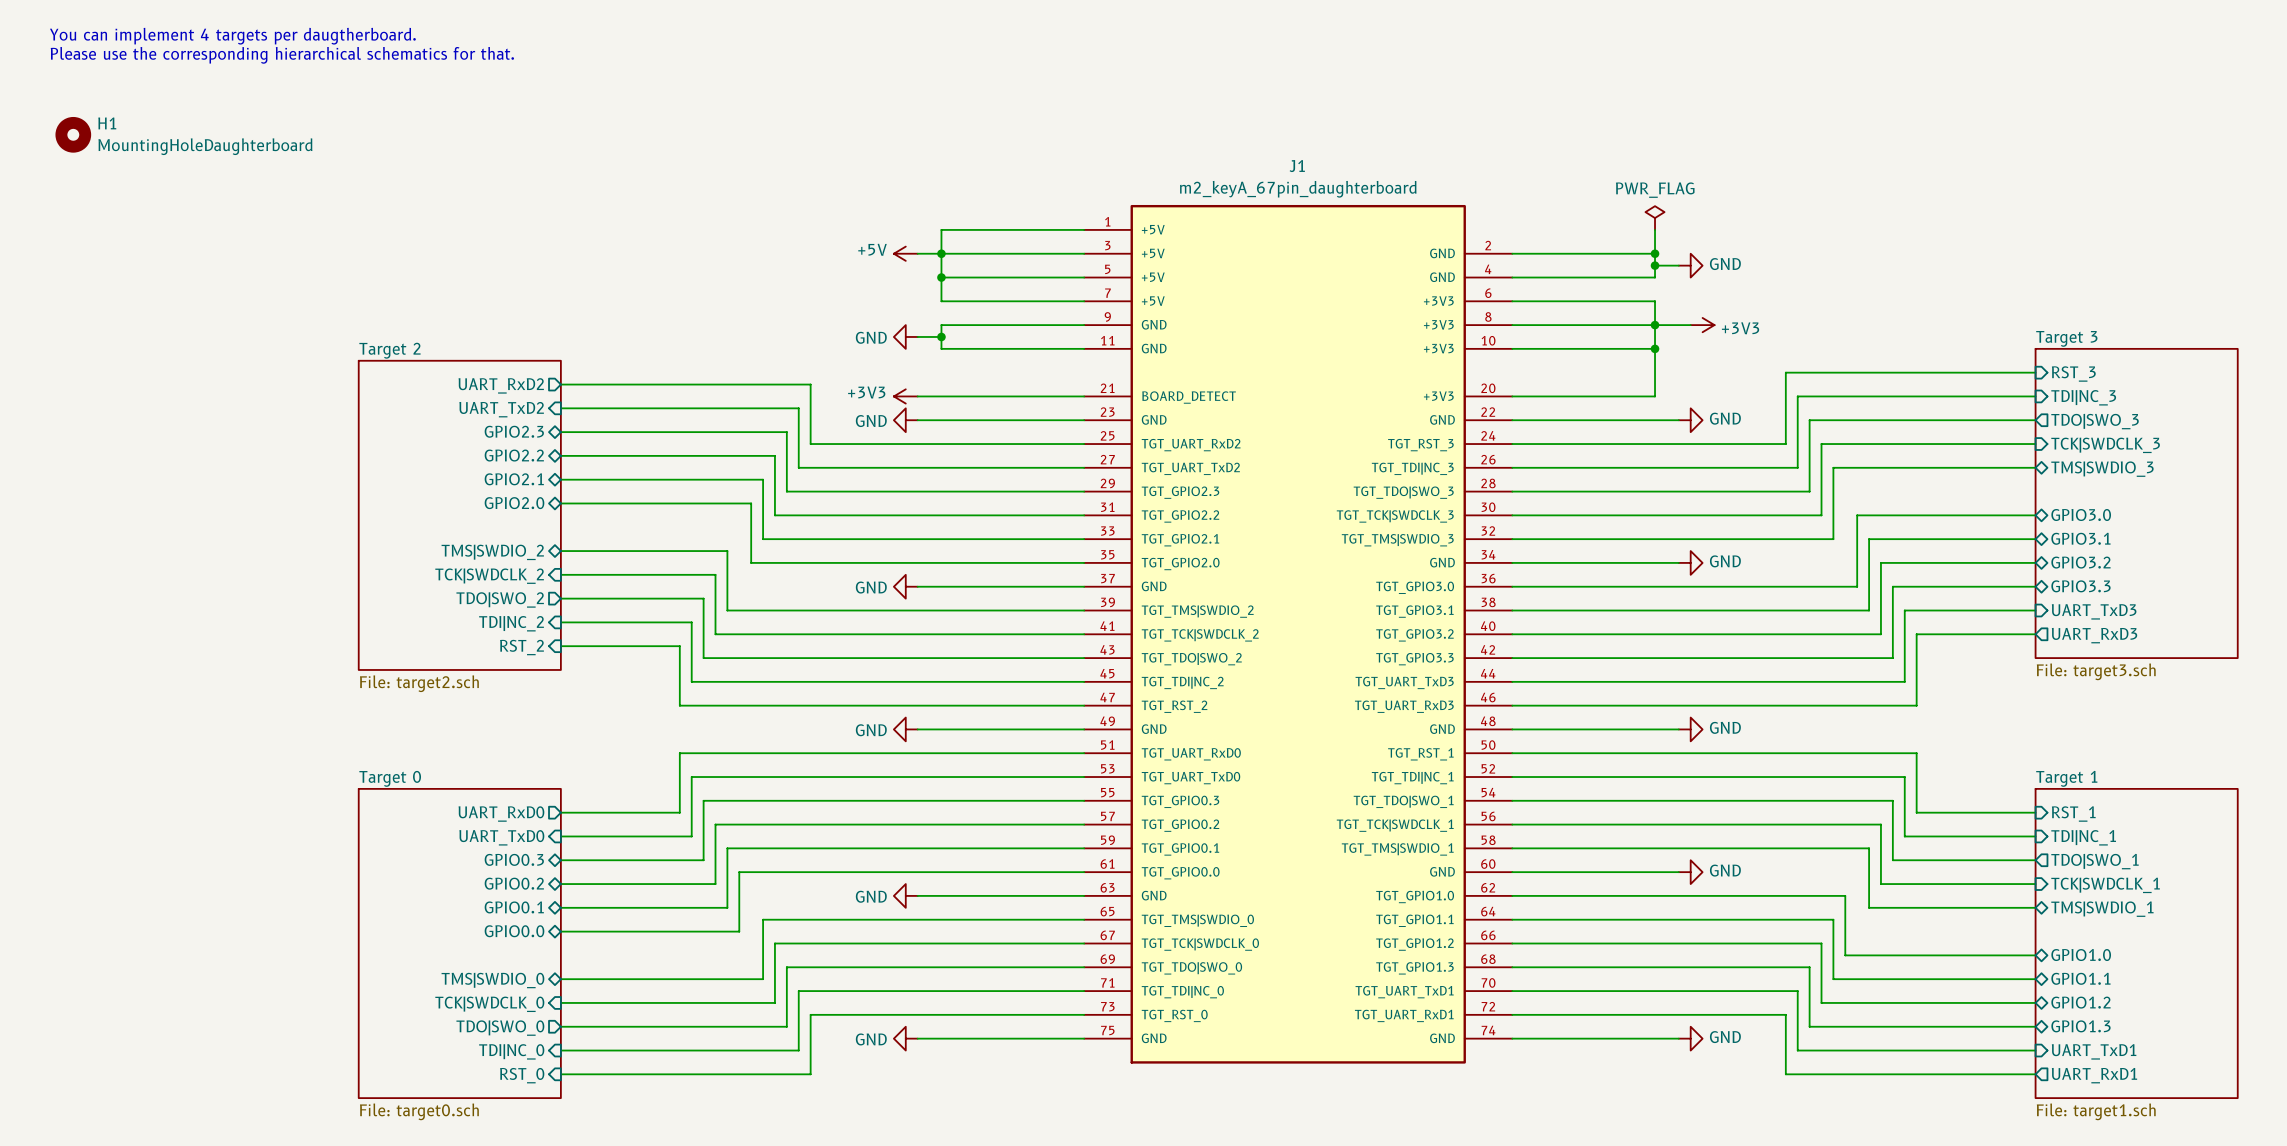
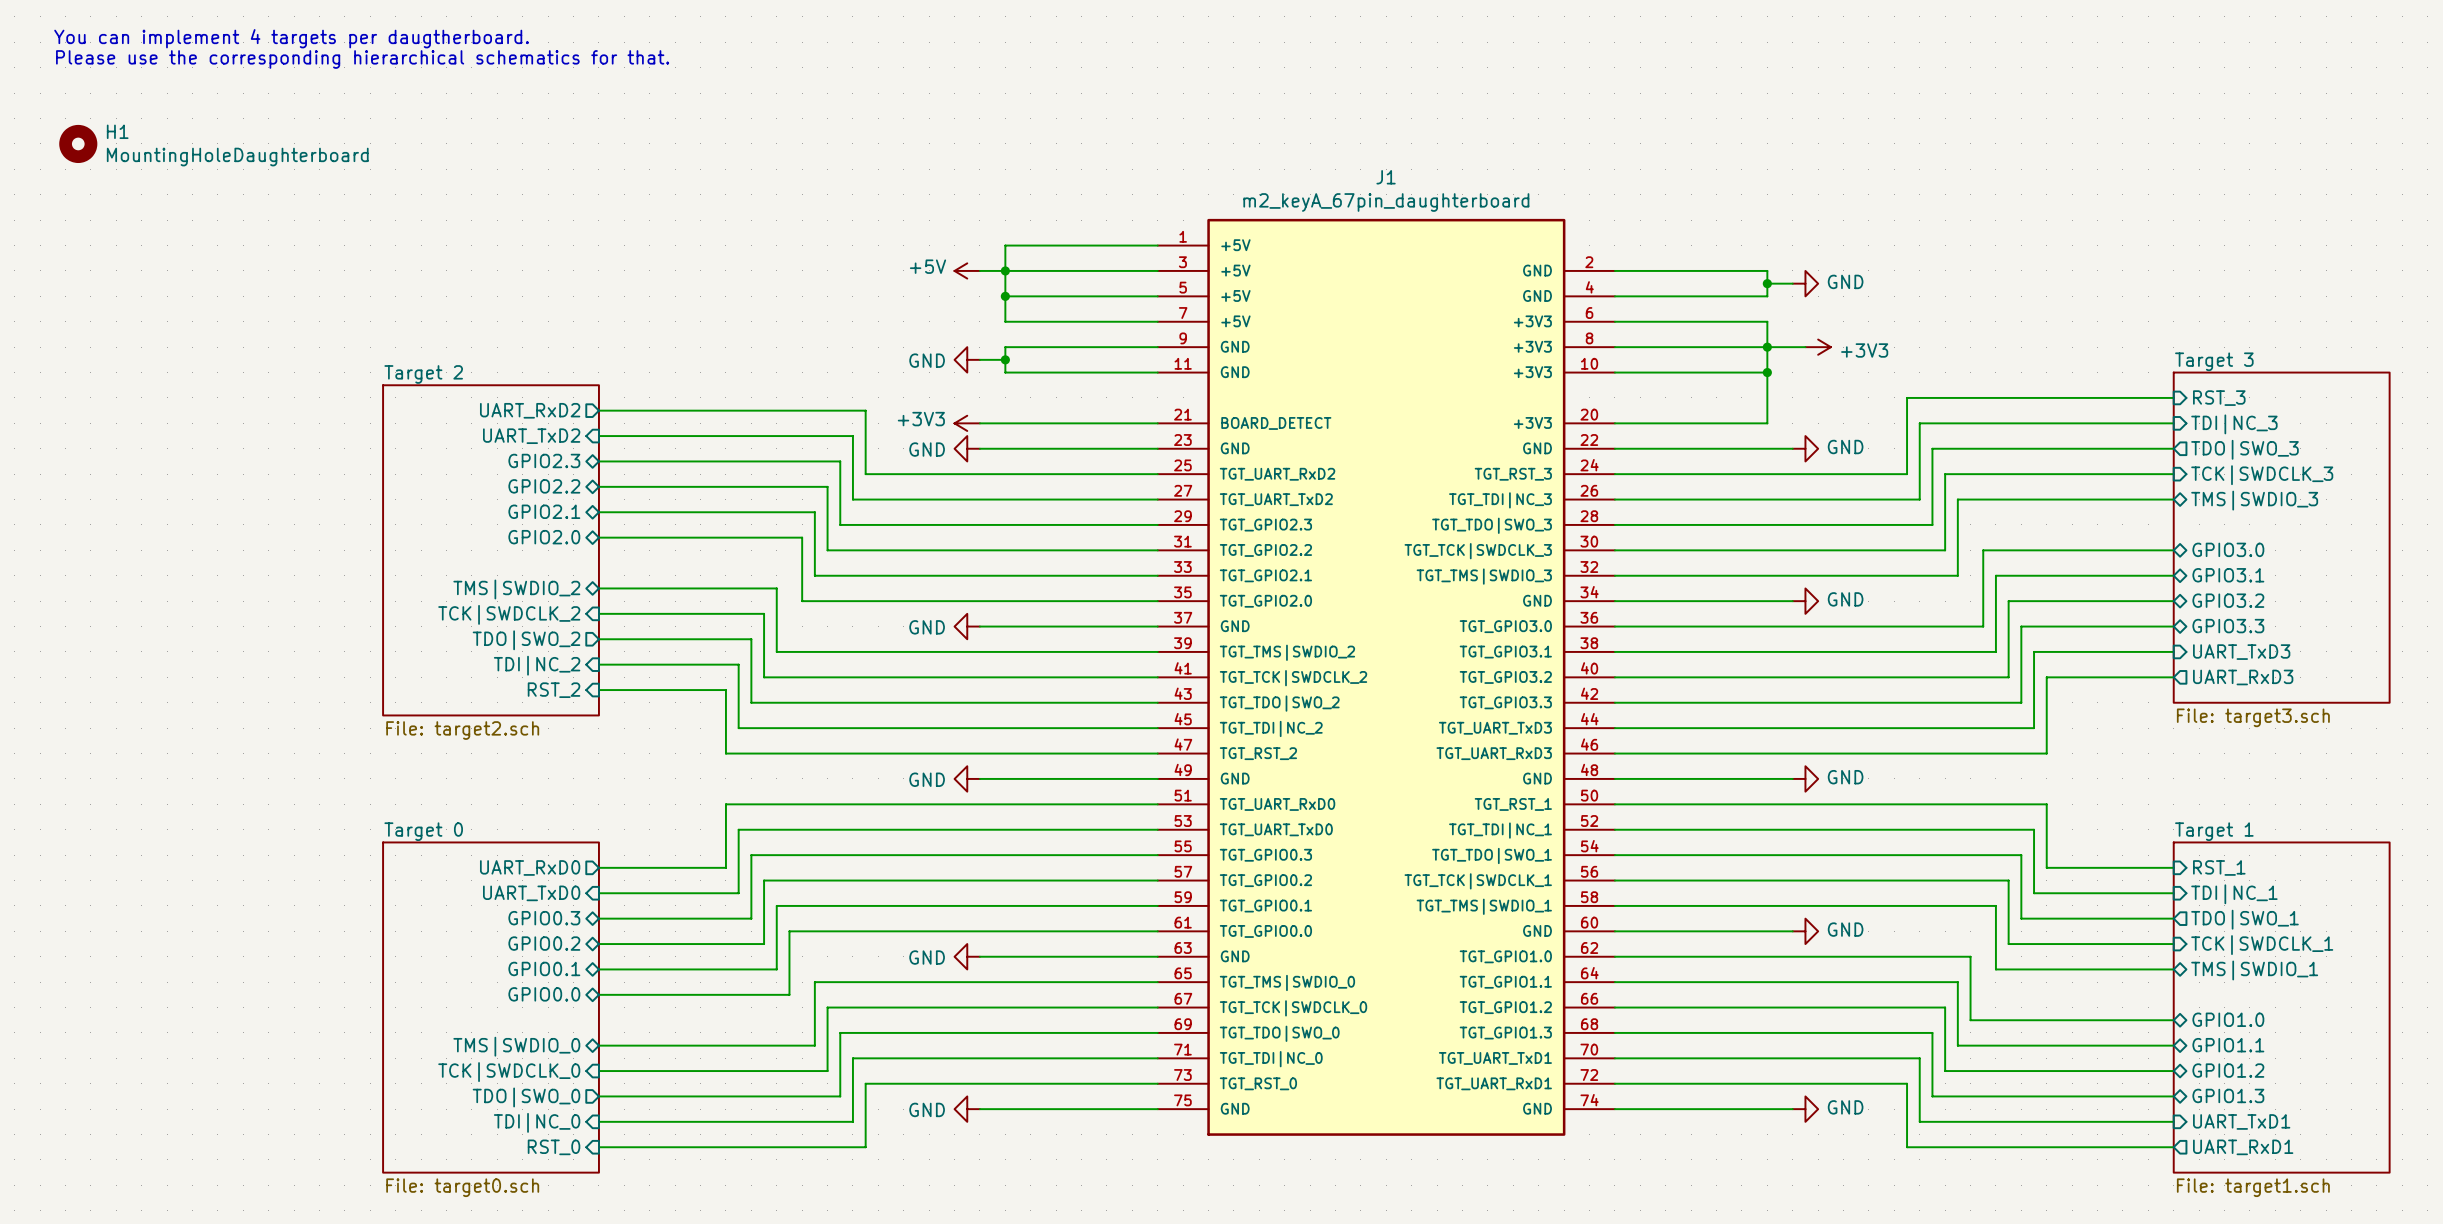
power symbol: PWR_FLAG (1655, 218) -> none
wire: (1655, 229) (1655, 253) -> none
junction: (1655, 253) -> none

